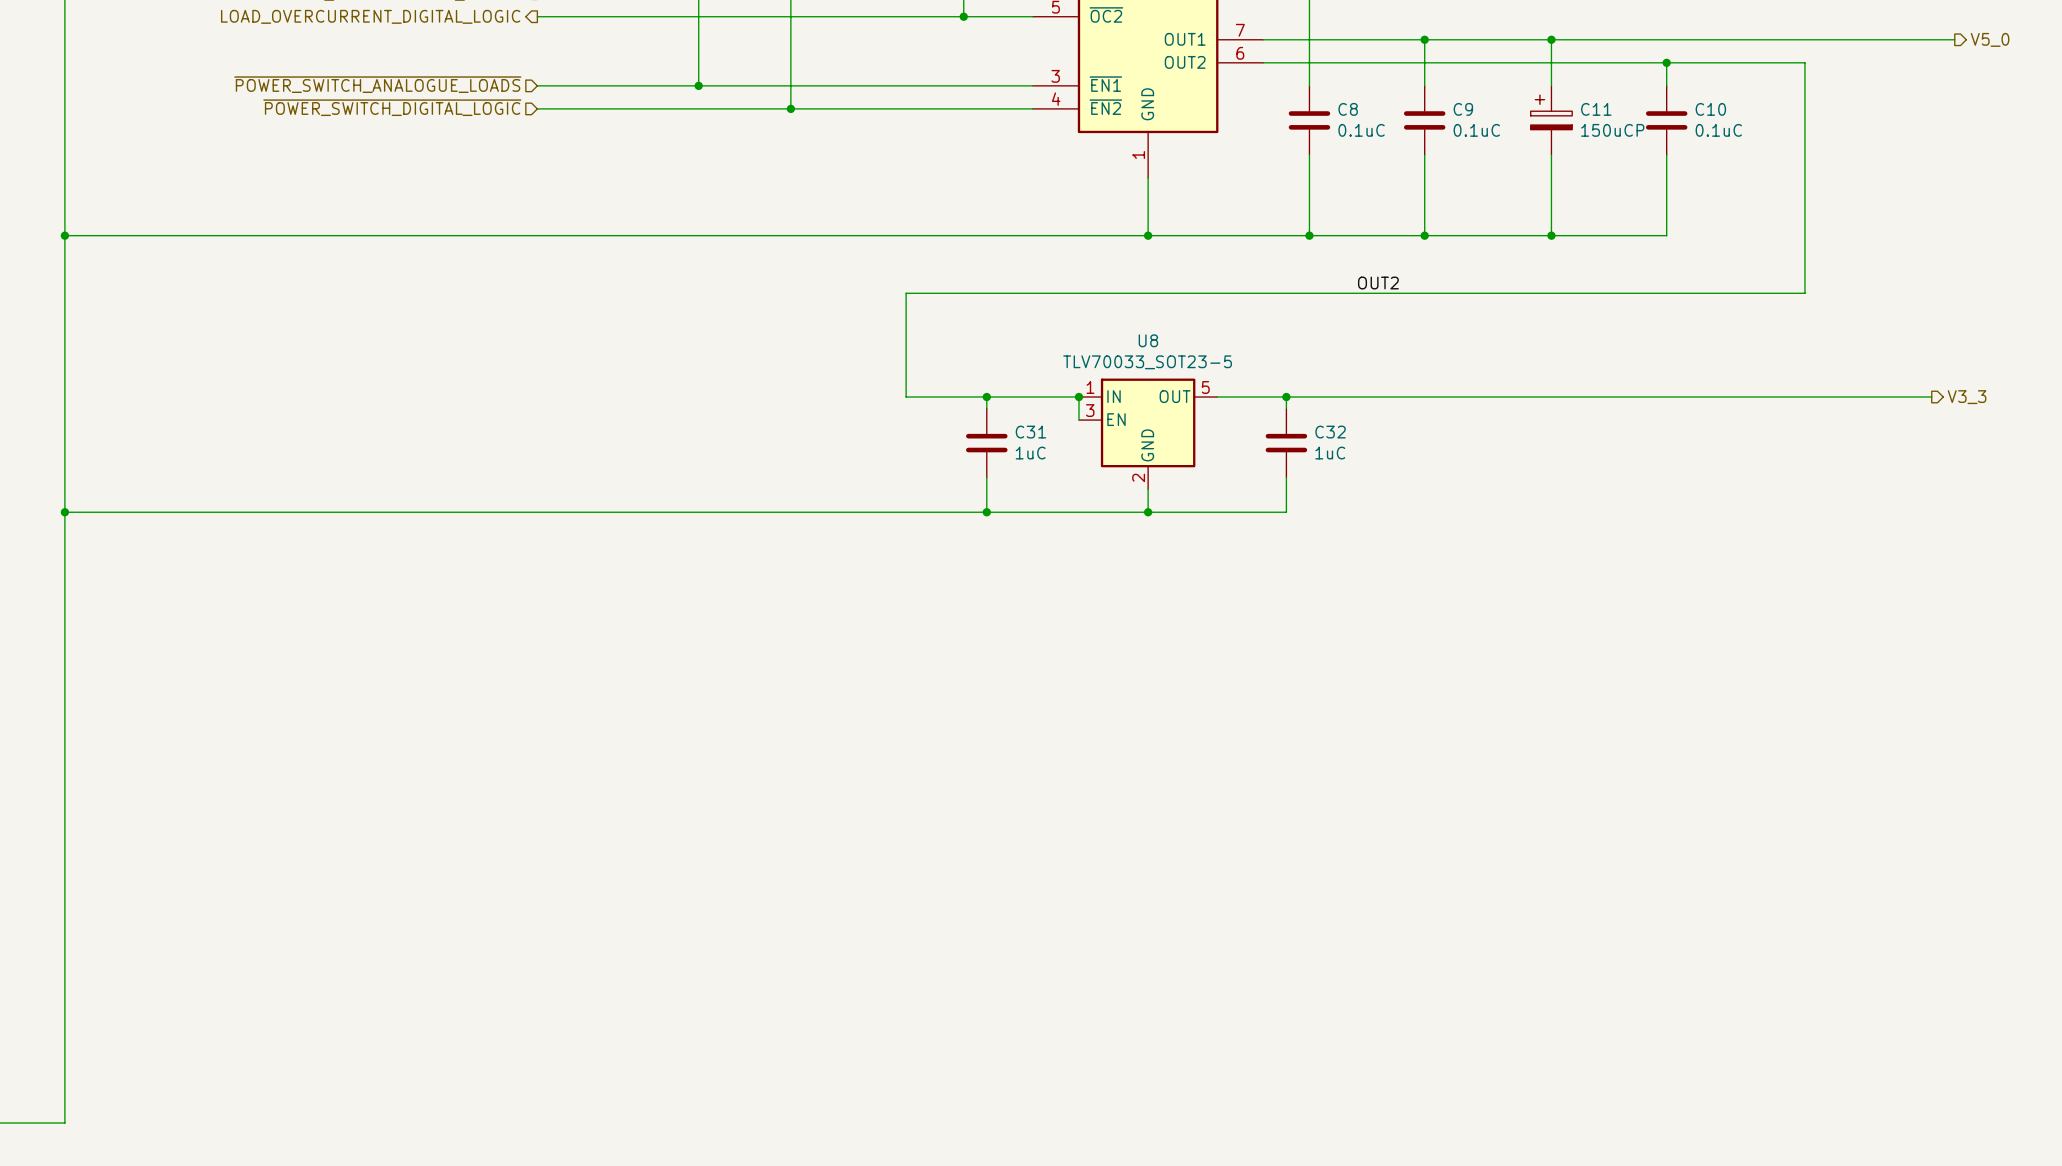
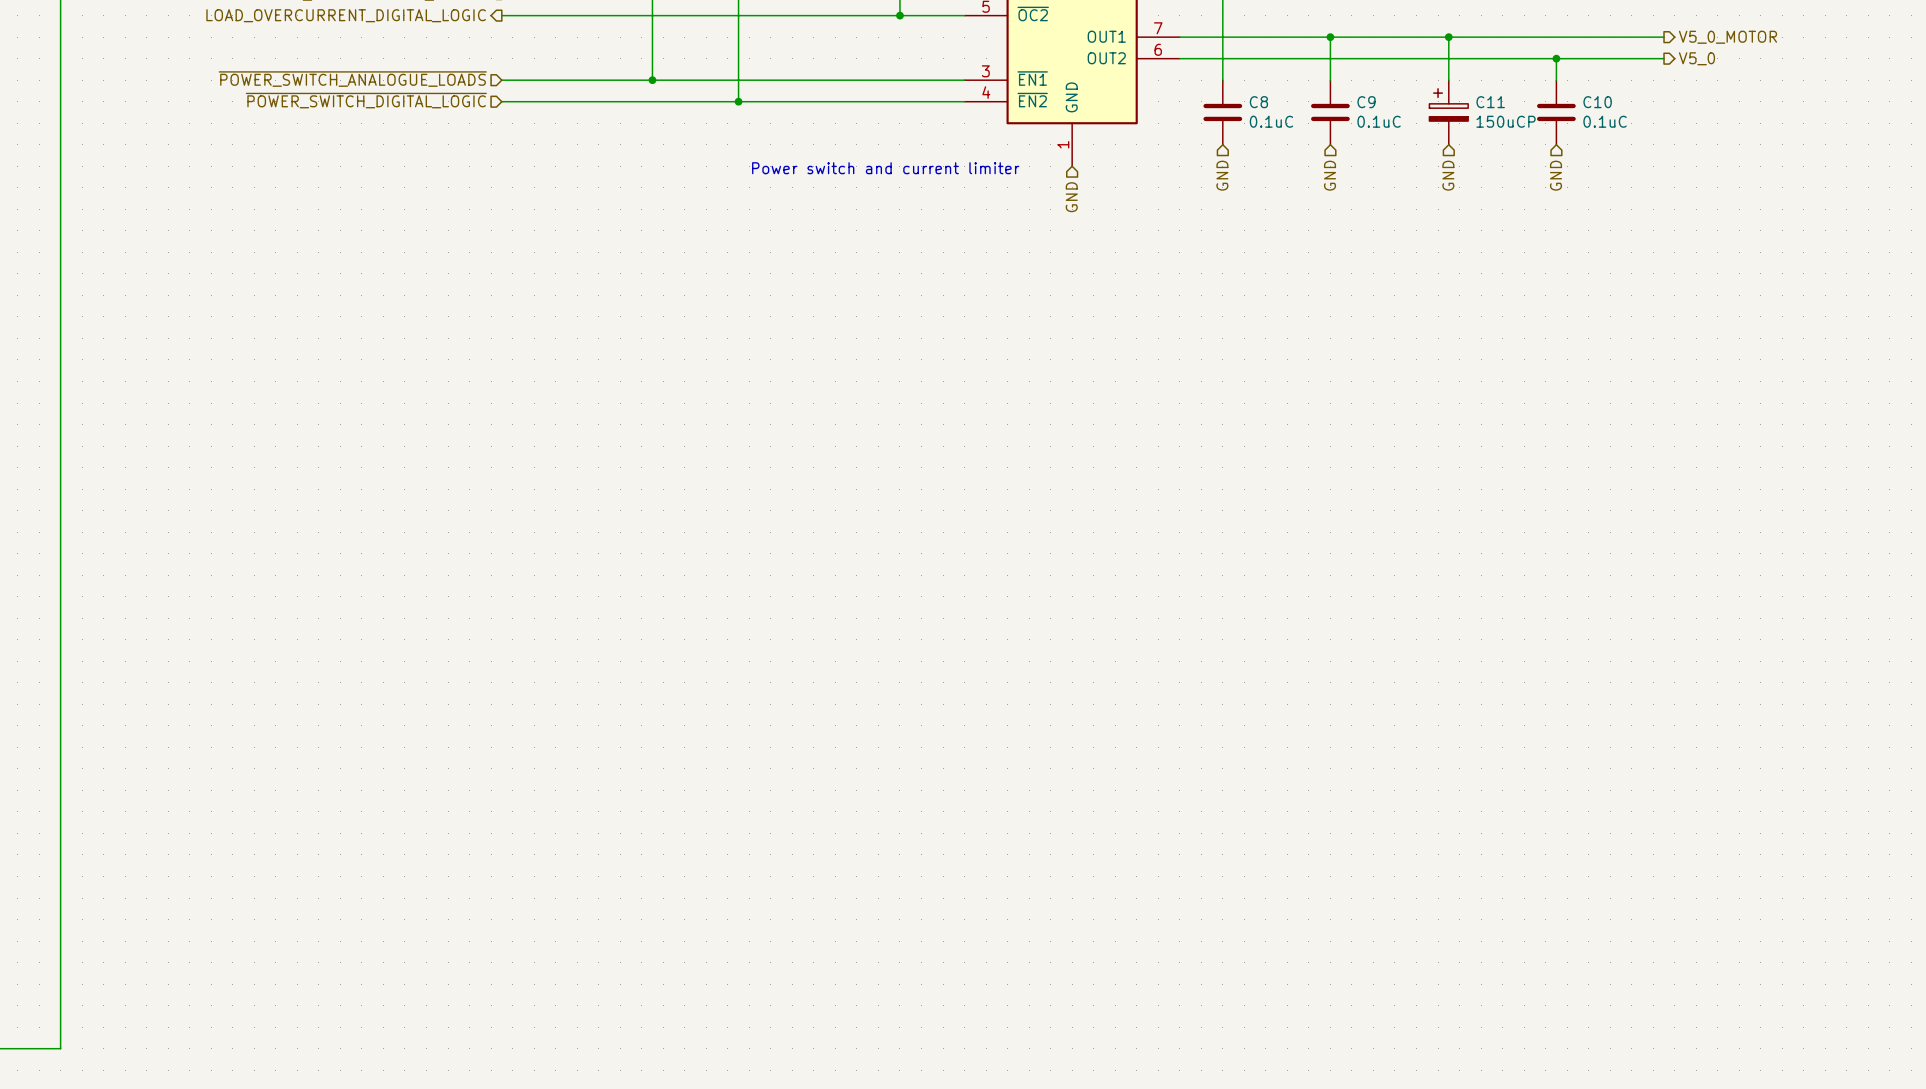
wire: (1781, 39) (1954, 39) -> none
hierarchical label: none -> V5_0_MOTOR (1727, 37)
hierarchical label position: V5_0 (1990, 39) -> V5_0 (1696, 58)
wire: (1781, 62) (1804, 62) (1804, 293) (906, 293) (906, 397) (1078, 397) (1078, 420) -> none
wire: (1309, 155) (1309, 235) -> none
wire: (1424, 155) (1424, 235) -> none
wire: (1551, 155) (1551, 235) -> none
wire: (1666, 155) (1666, 235) (64, 235) -> none
wire: (1148, 178) (1148, 235) -> none
text: none -> Power switch and current limiter (885, 168)
hierarchical label: none -> GND (1222, 175)
hierarchical label: none -> GND (1330, 175)
hierarchical label: none -> GND (1448, 175)
hierarchical label: none -> GND (1556, 175)
hierarchical label: none -> GND (1071, 197)
junction: (64, 235) -> none
junction: (1148, 235) -> none
junction: (1309, 235) -> none
junction: (1424, 235) -> none
junction: (1551, 235) -> none
label: OUT2 (1378, 283) -> none
wire: (986, 397) (986, 408) -> none
junction: (986, 397) -> none
junction: (1078, 397) -> none
wire: (1217, 397) (1931, 397) -> none
wire: (1286, 397) (1286, 408) -> none
junction: (1286, 397) -> none
hierarchical label: V3_3 (1967, 397) -> none
U8: TLV70033_SOT23-5 (1148, 433) -> none
C31: 1uC (986, 443) -> none
C32: 1uC (1286, 443) -> none
wire: (986, 477) (986, 512) -> none
wire: (1286, 477) (1286, 512) (64, 512) -> none
wire: (1148, 489) (1148, 512) -> none
junction: (64, 512) -> none
junction: (986, 512) -> none
junction: (1148, 512) -> none

